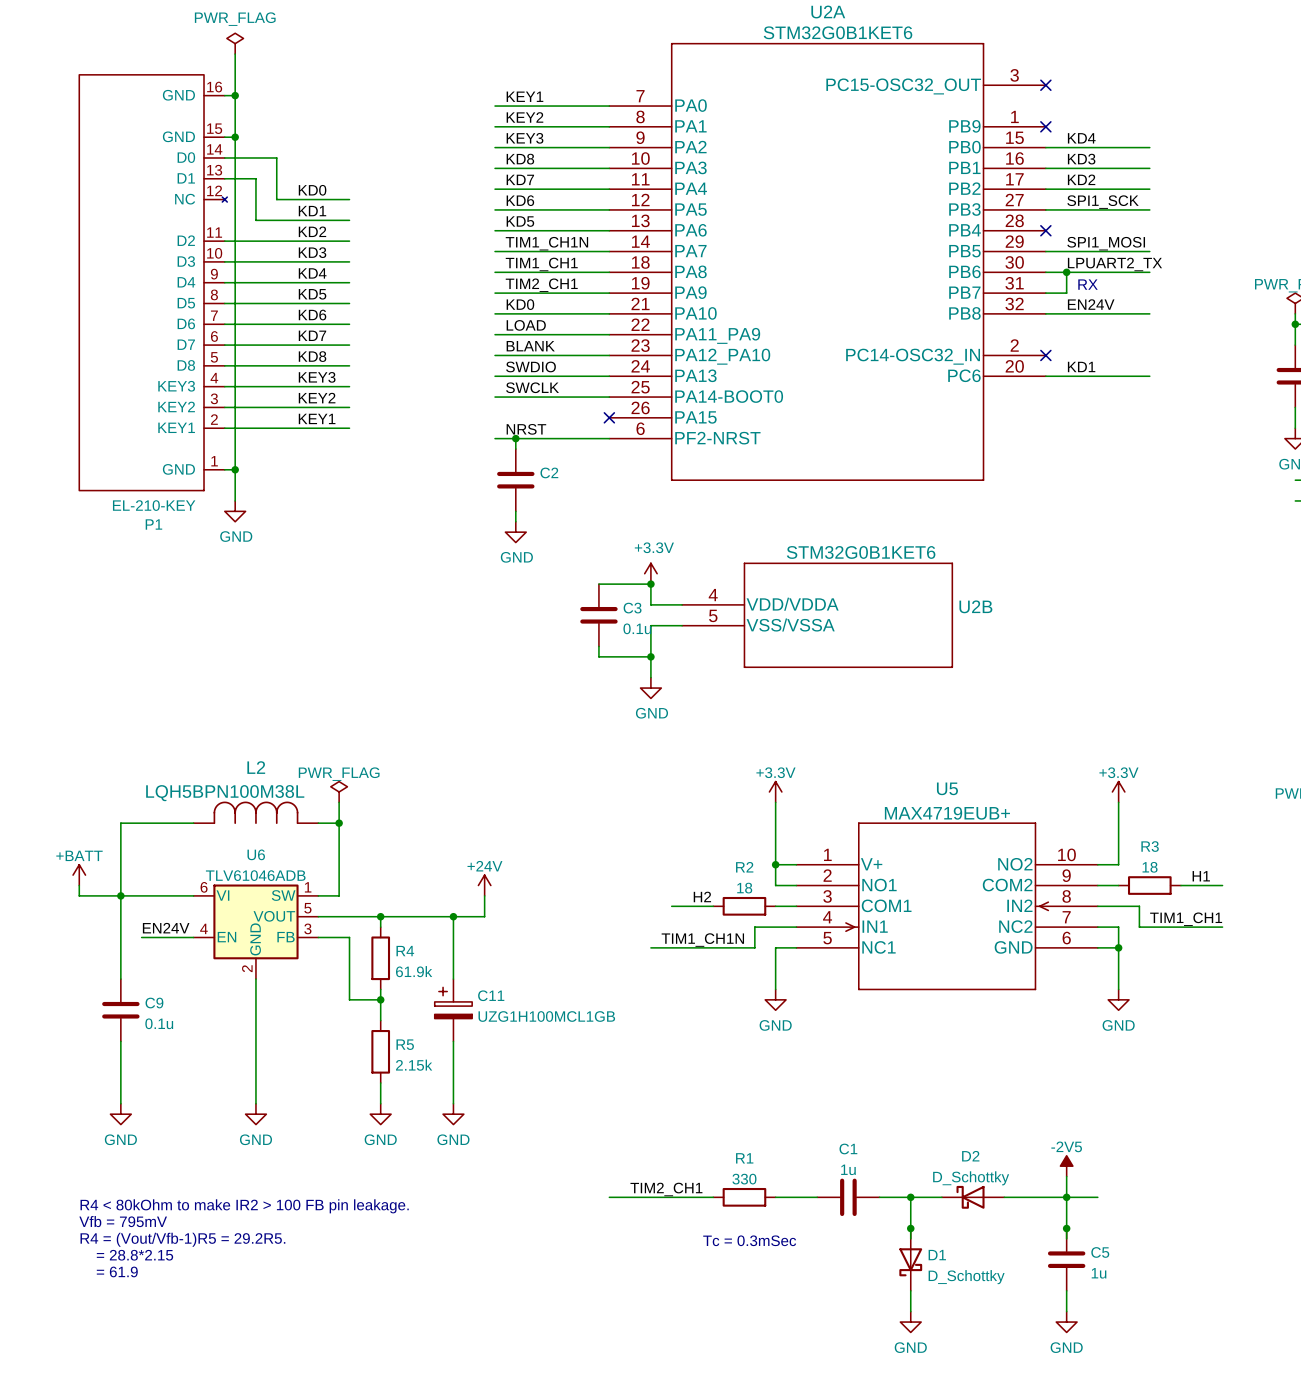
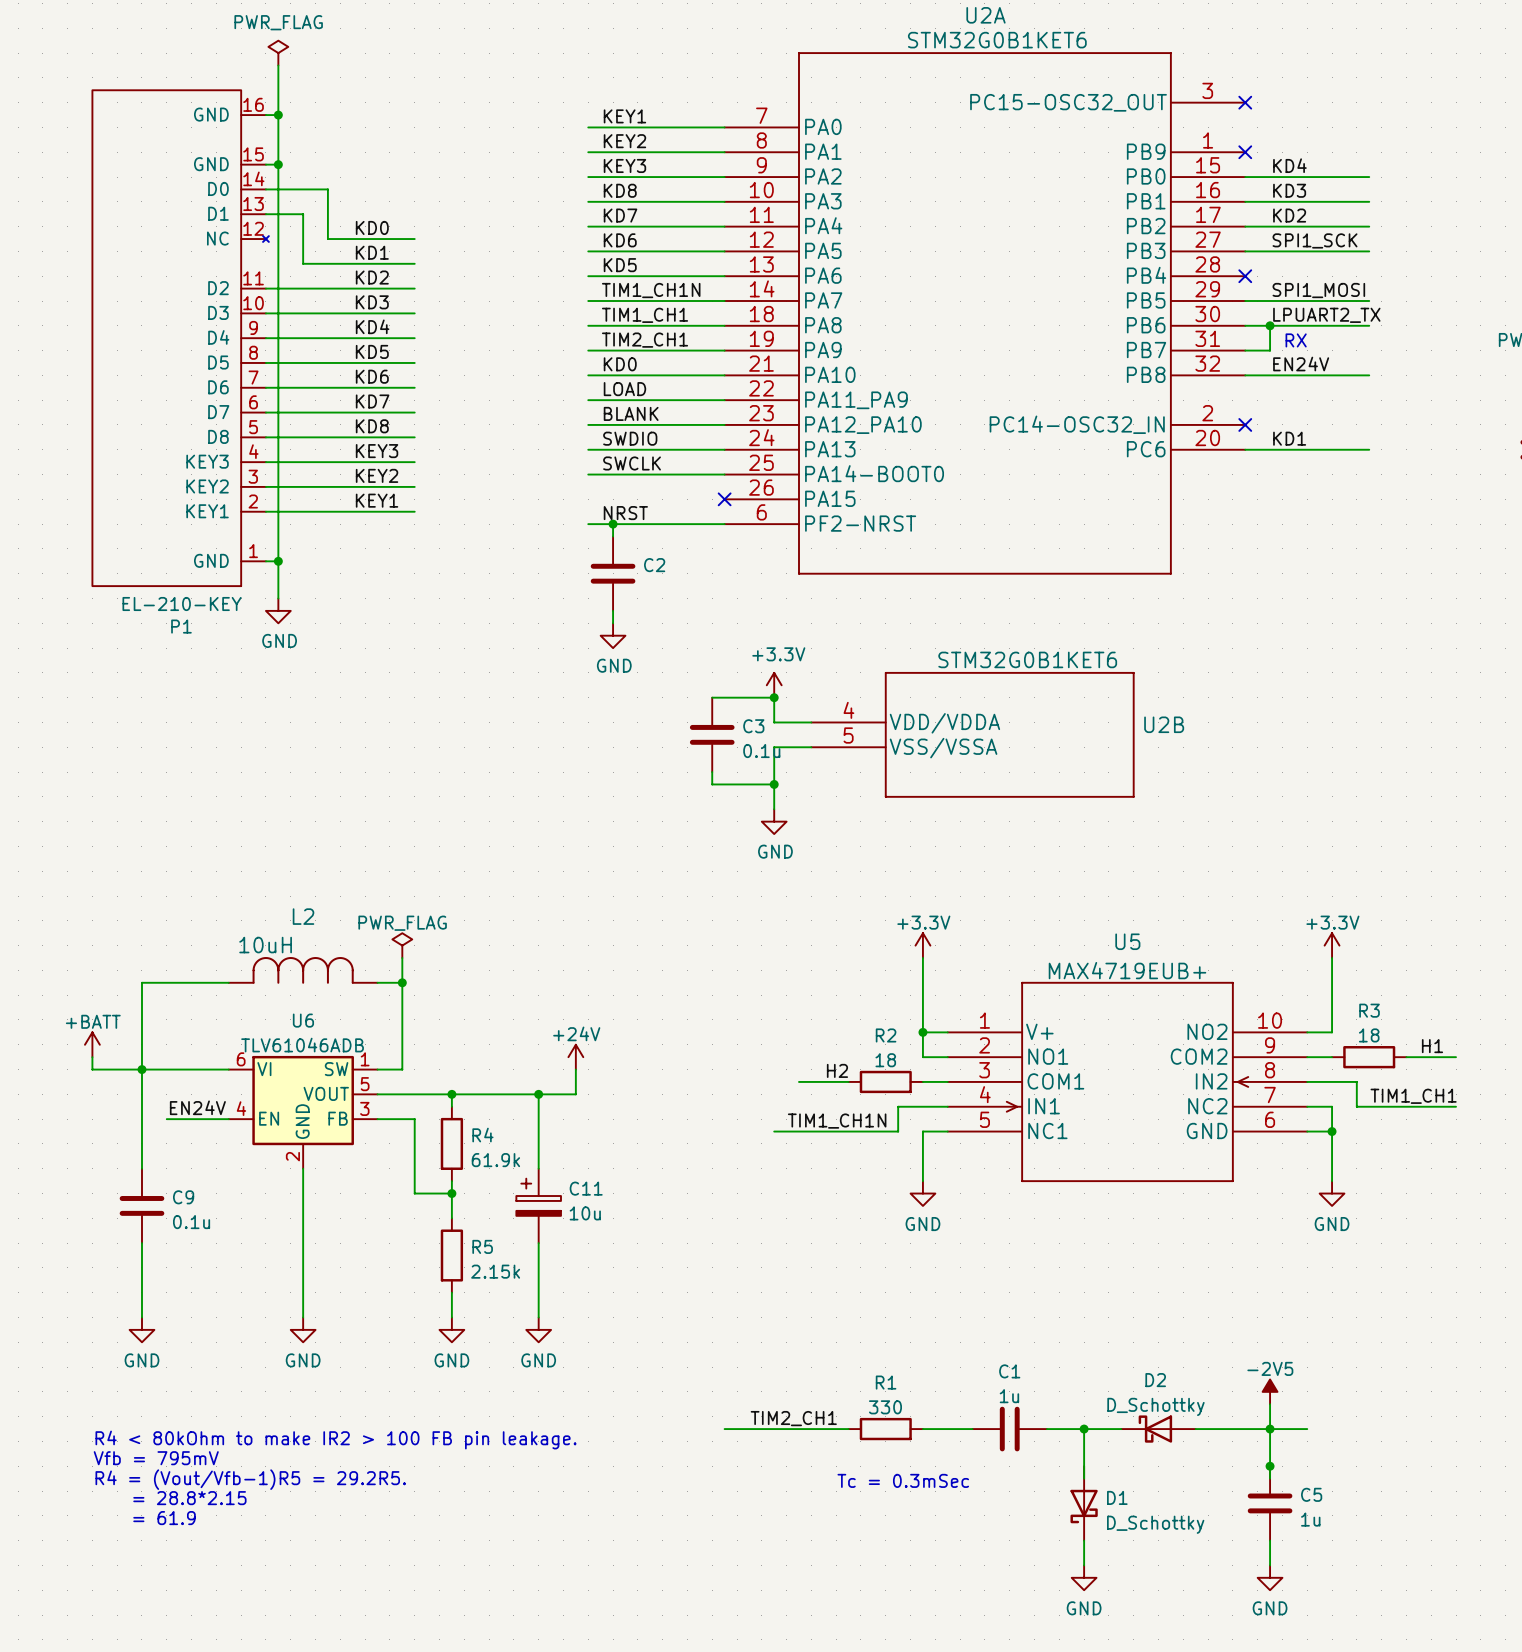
L2 value: LQH5BPN100M38L (225, 793) -> 10uH (265, 945)
C11 value: UZG1H100MCL1GB (546, 1016) -> 10u (585, 1213)
junction: (910, 1228) -> none

